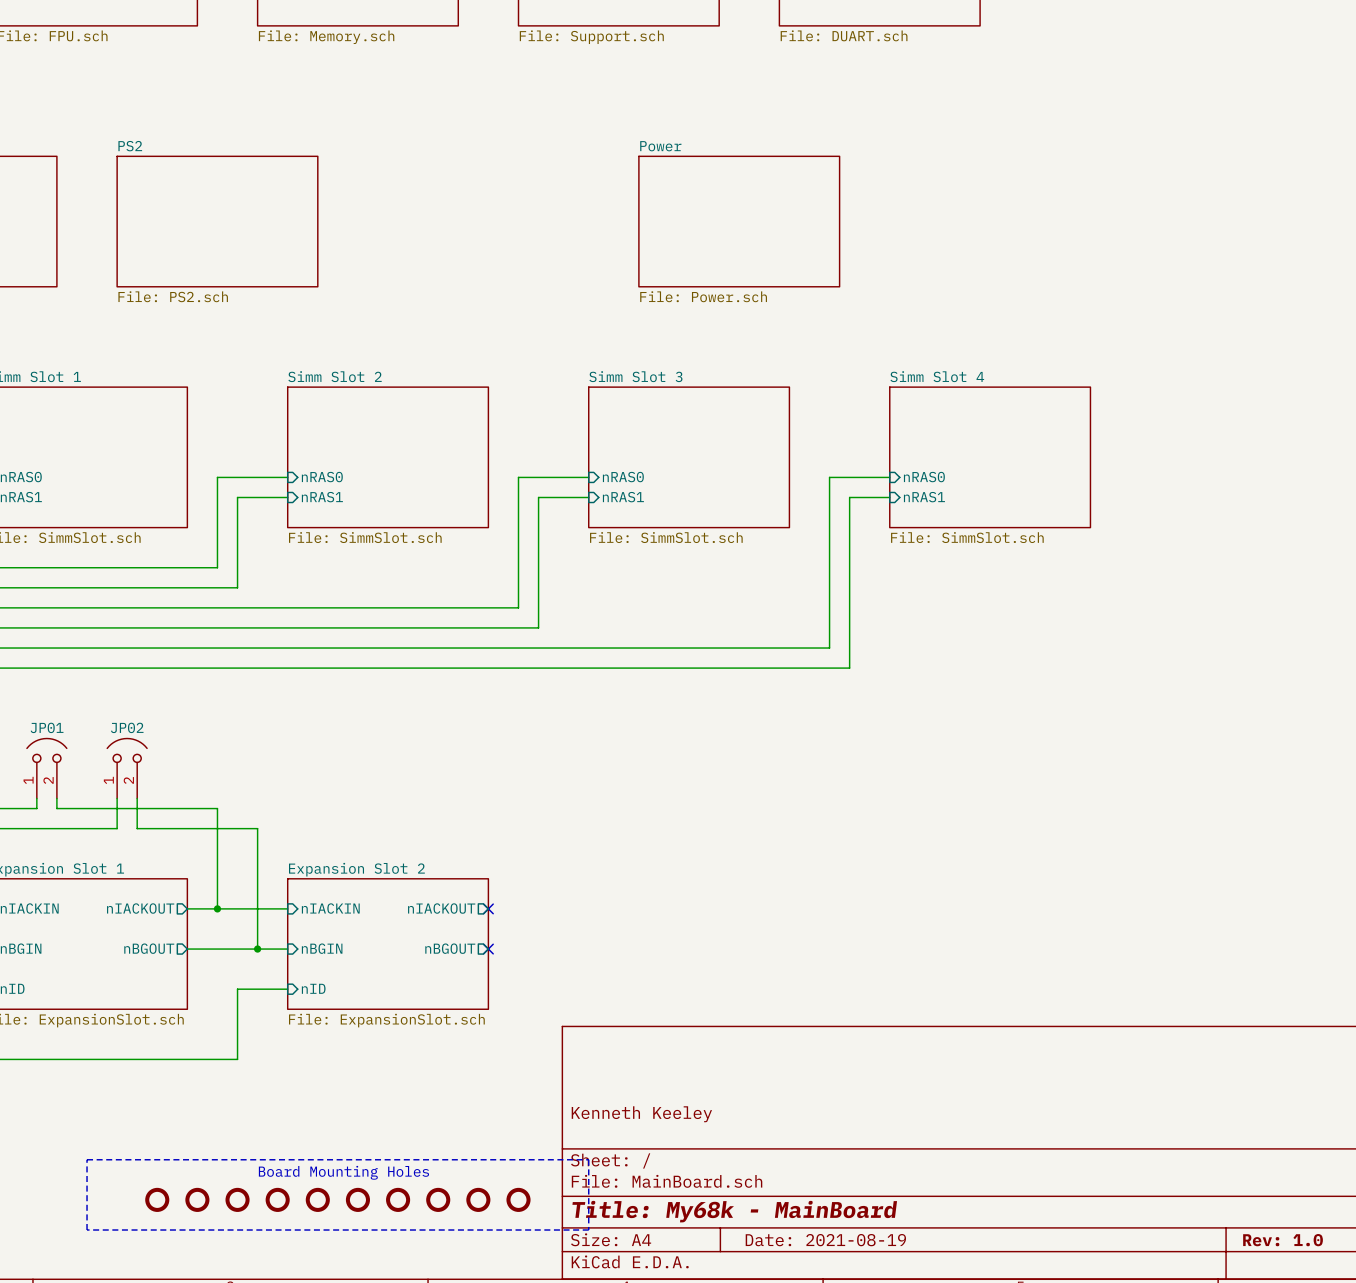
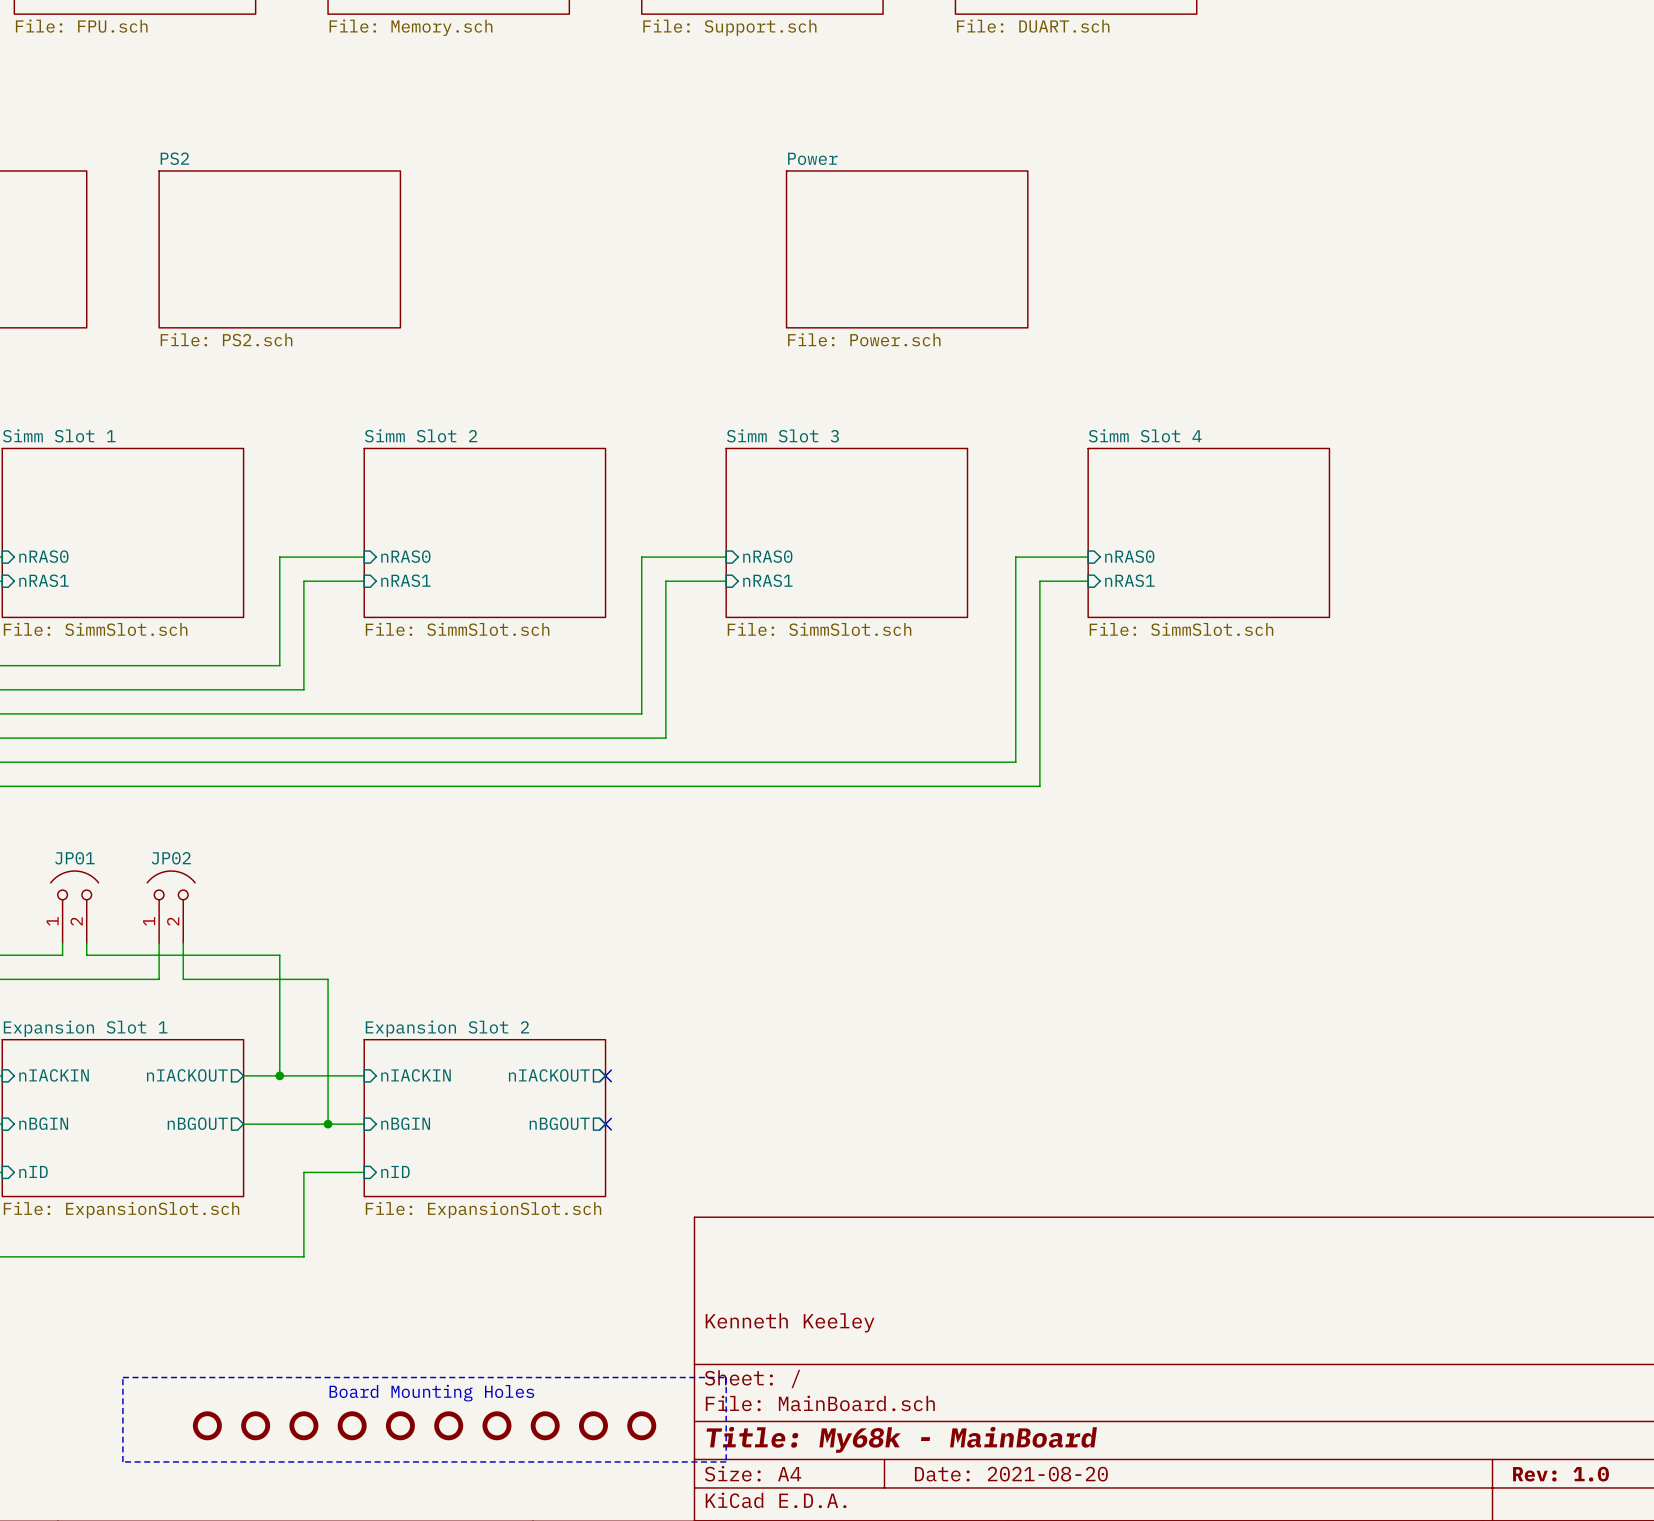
title block: Date: 2021-08-19 (825, 1240) -> Date: 2021-08-20 (1011, 1474)

